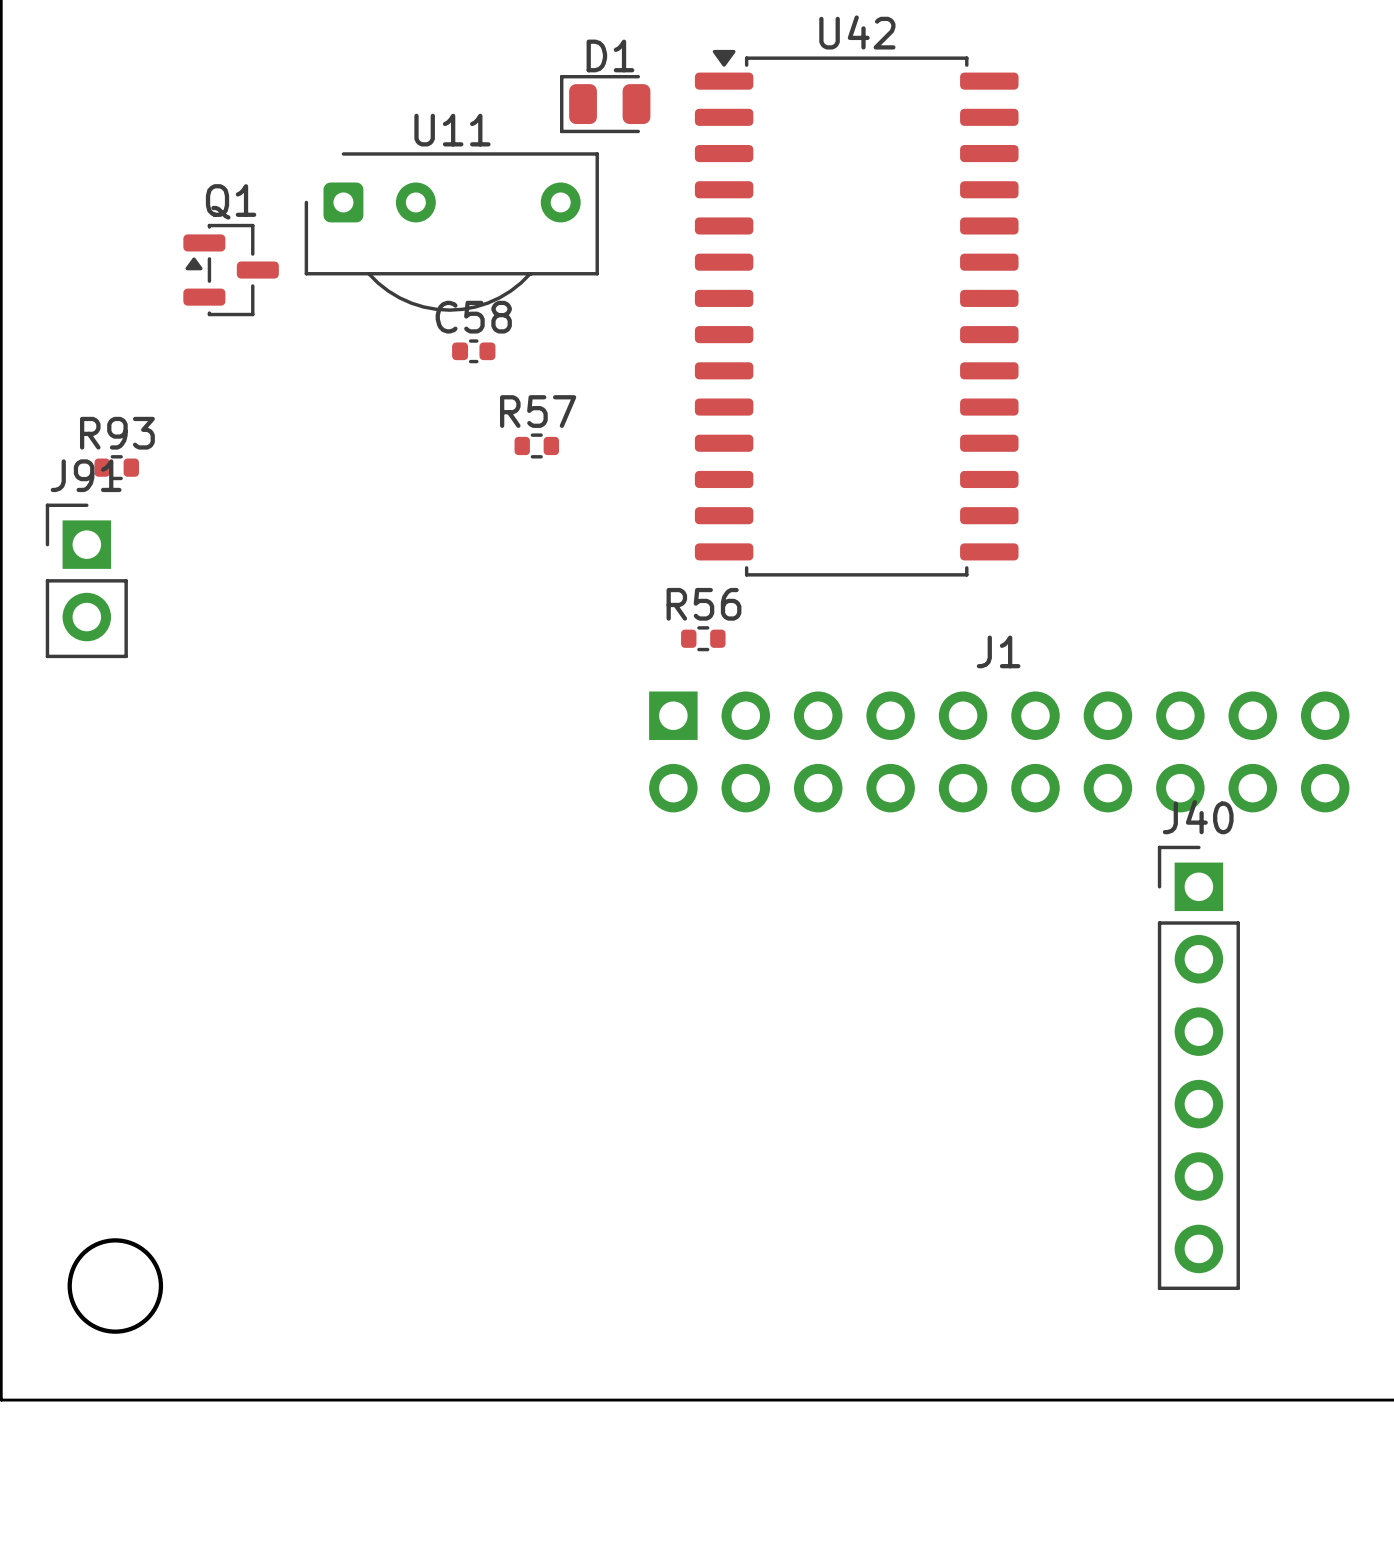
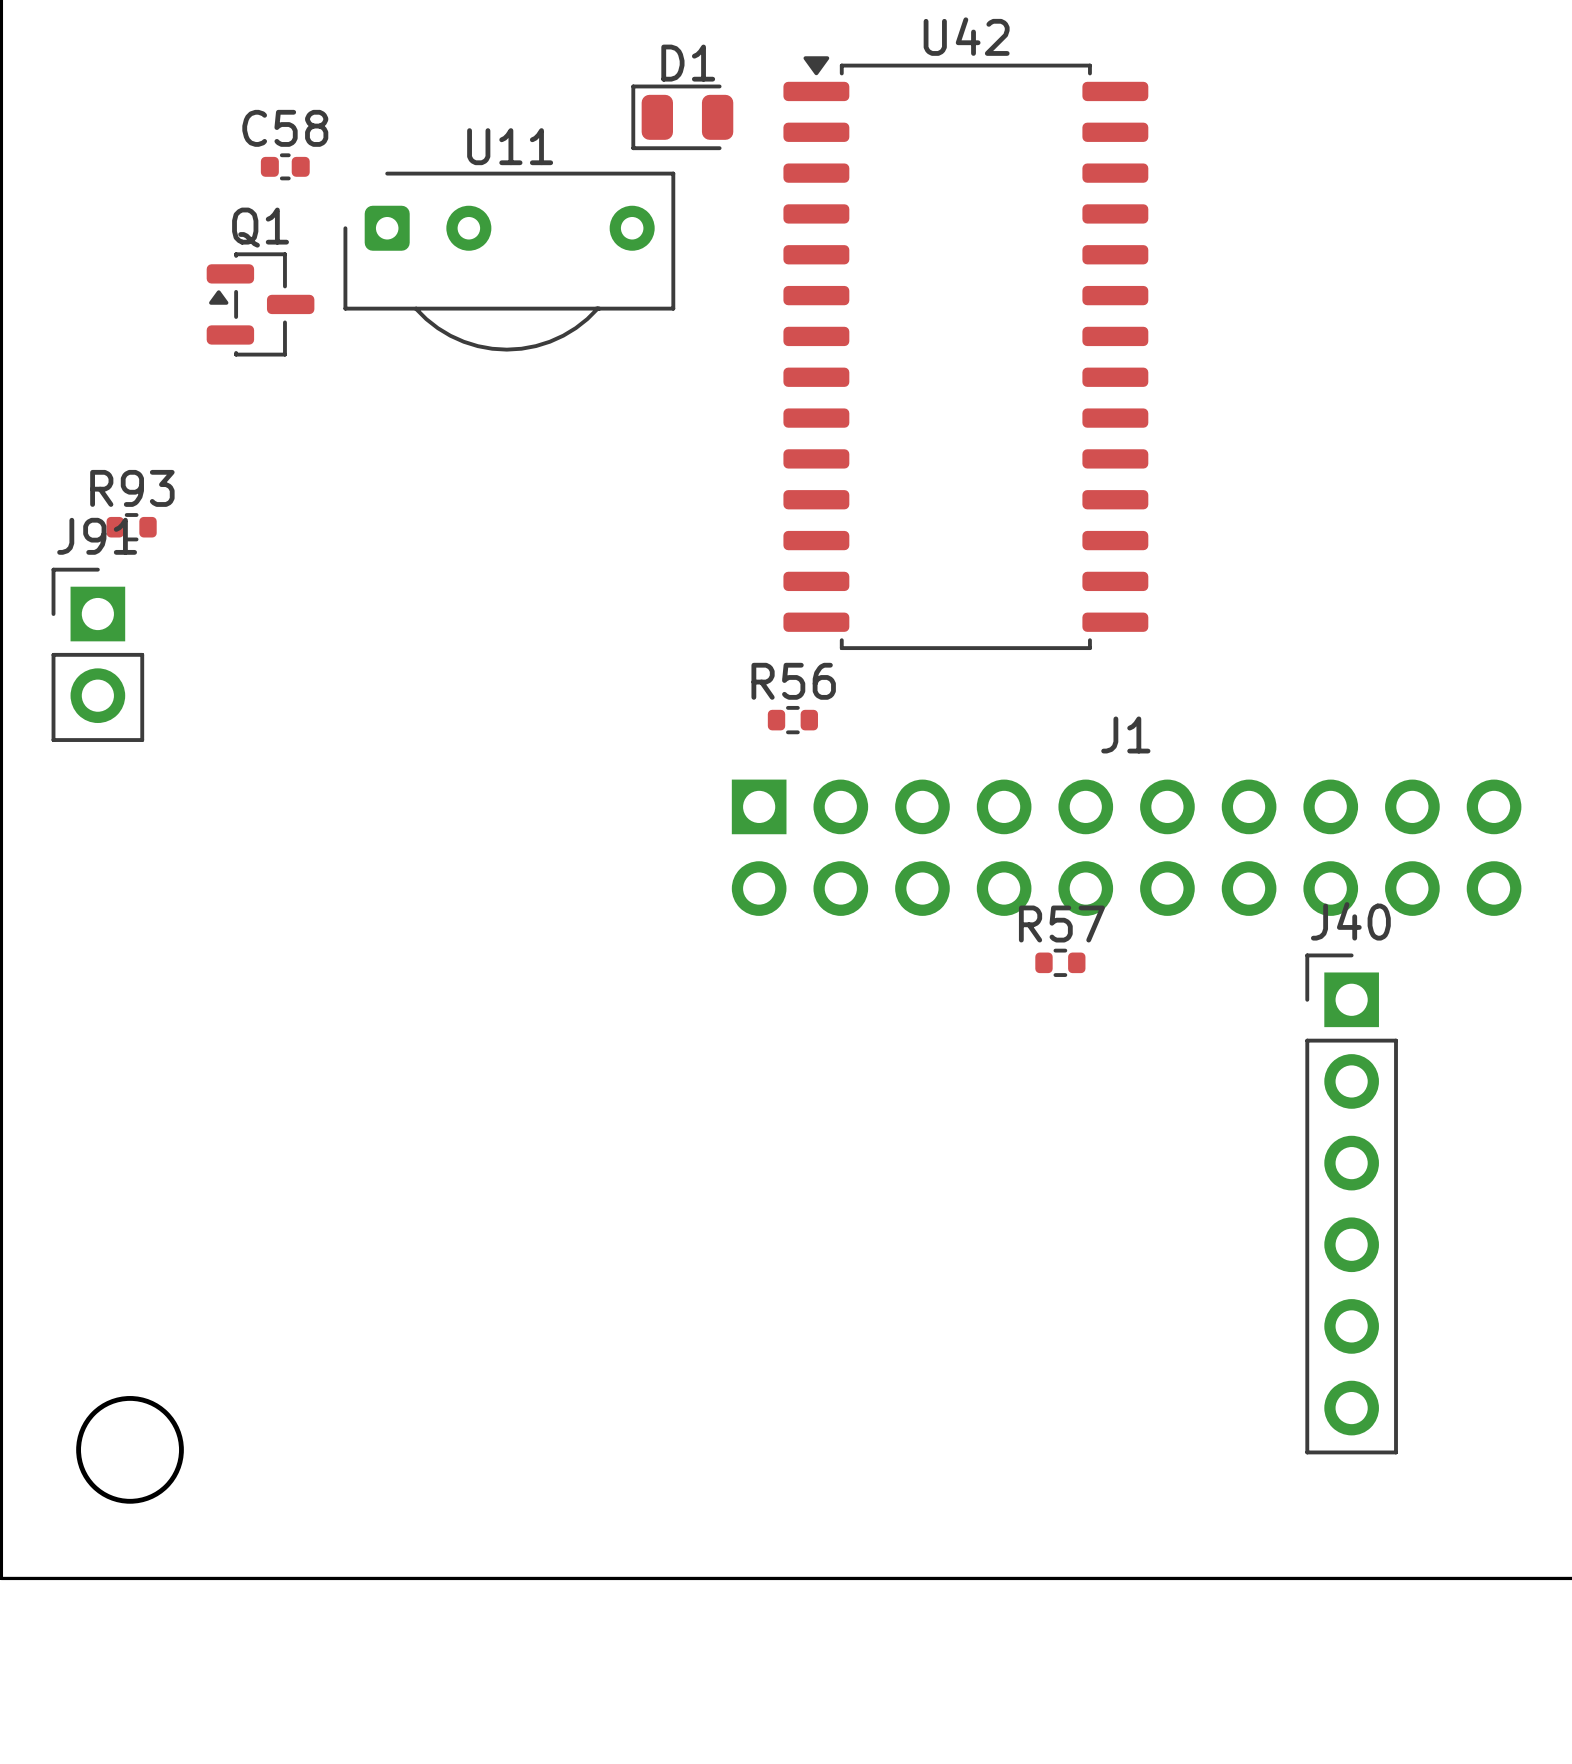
C58 position: (473, 351) -> (285, 166)
R57 position: (536, 445) -> (1060, 962)

